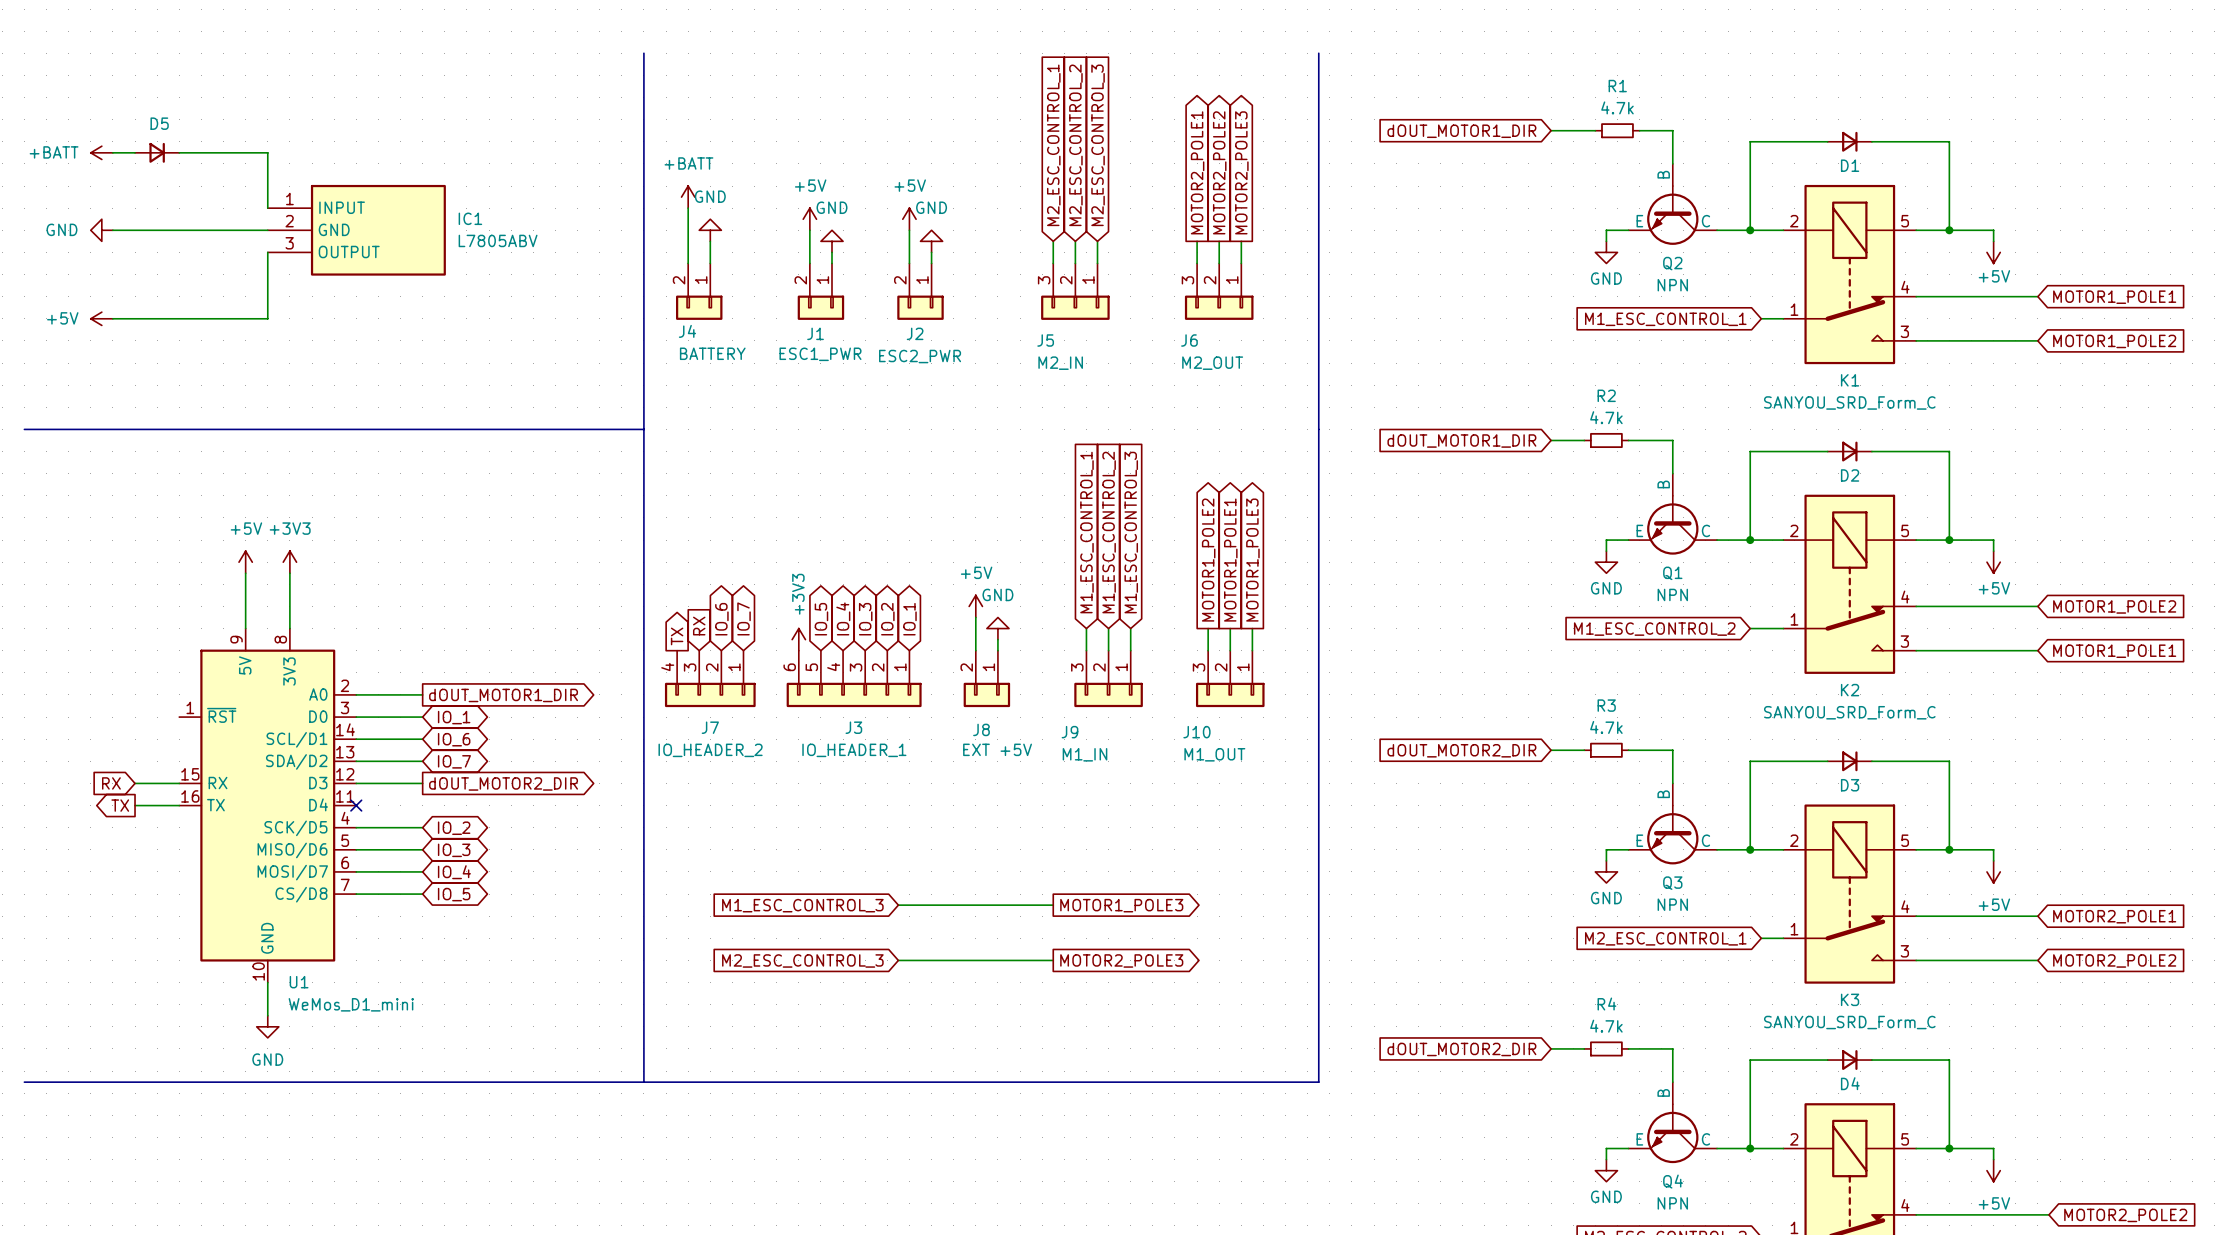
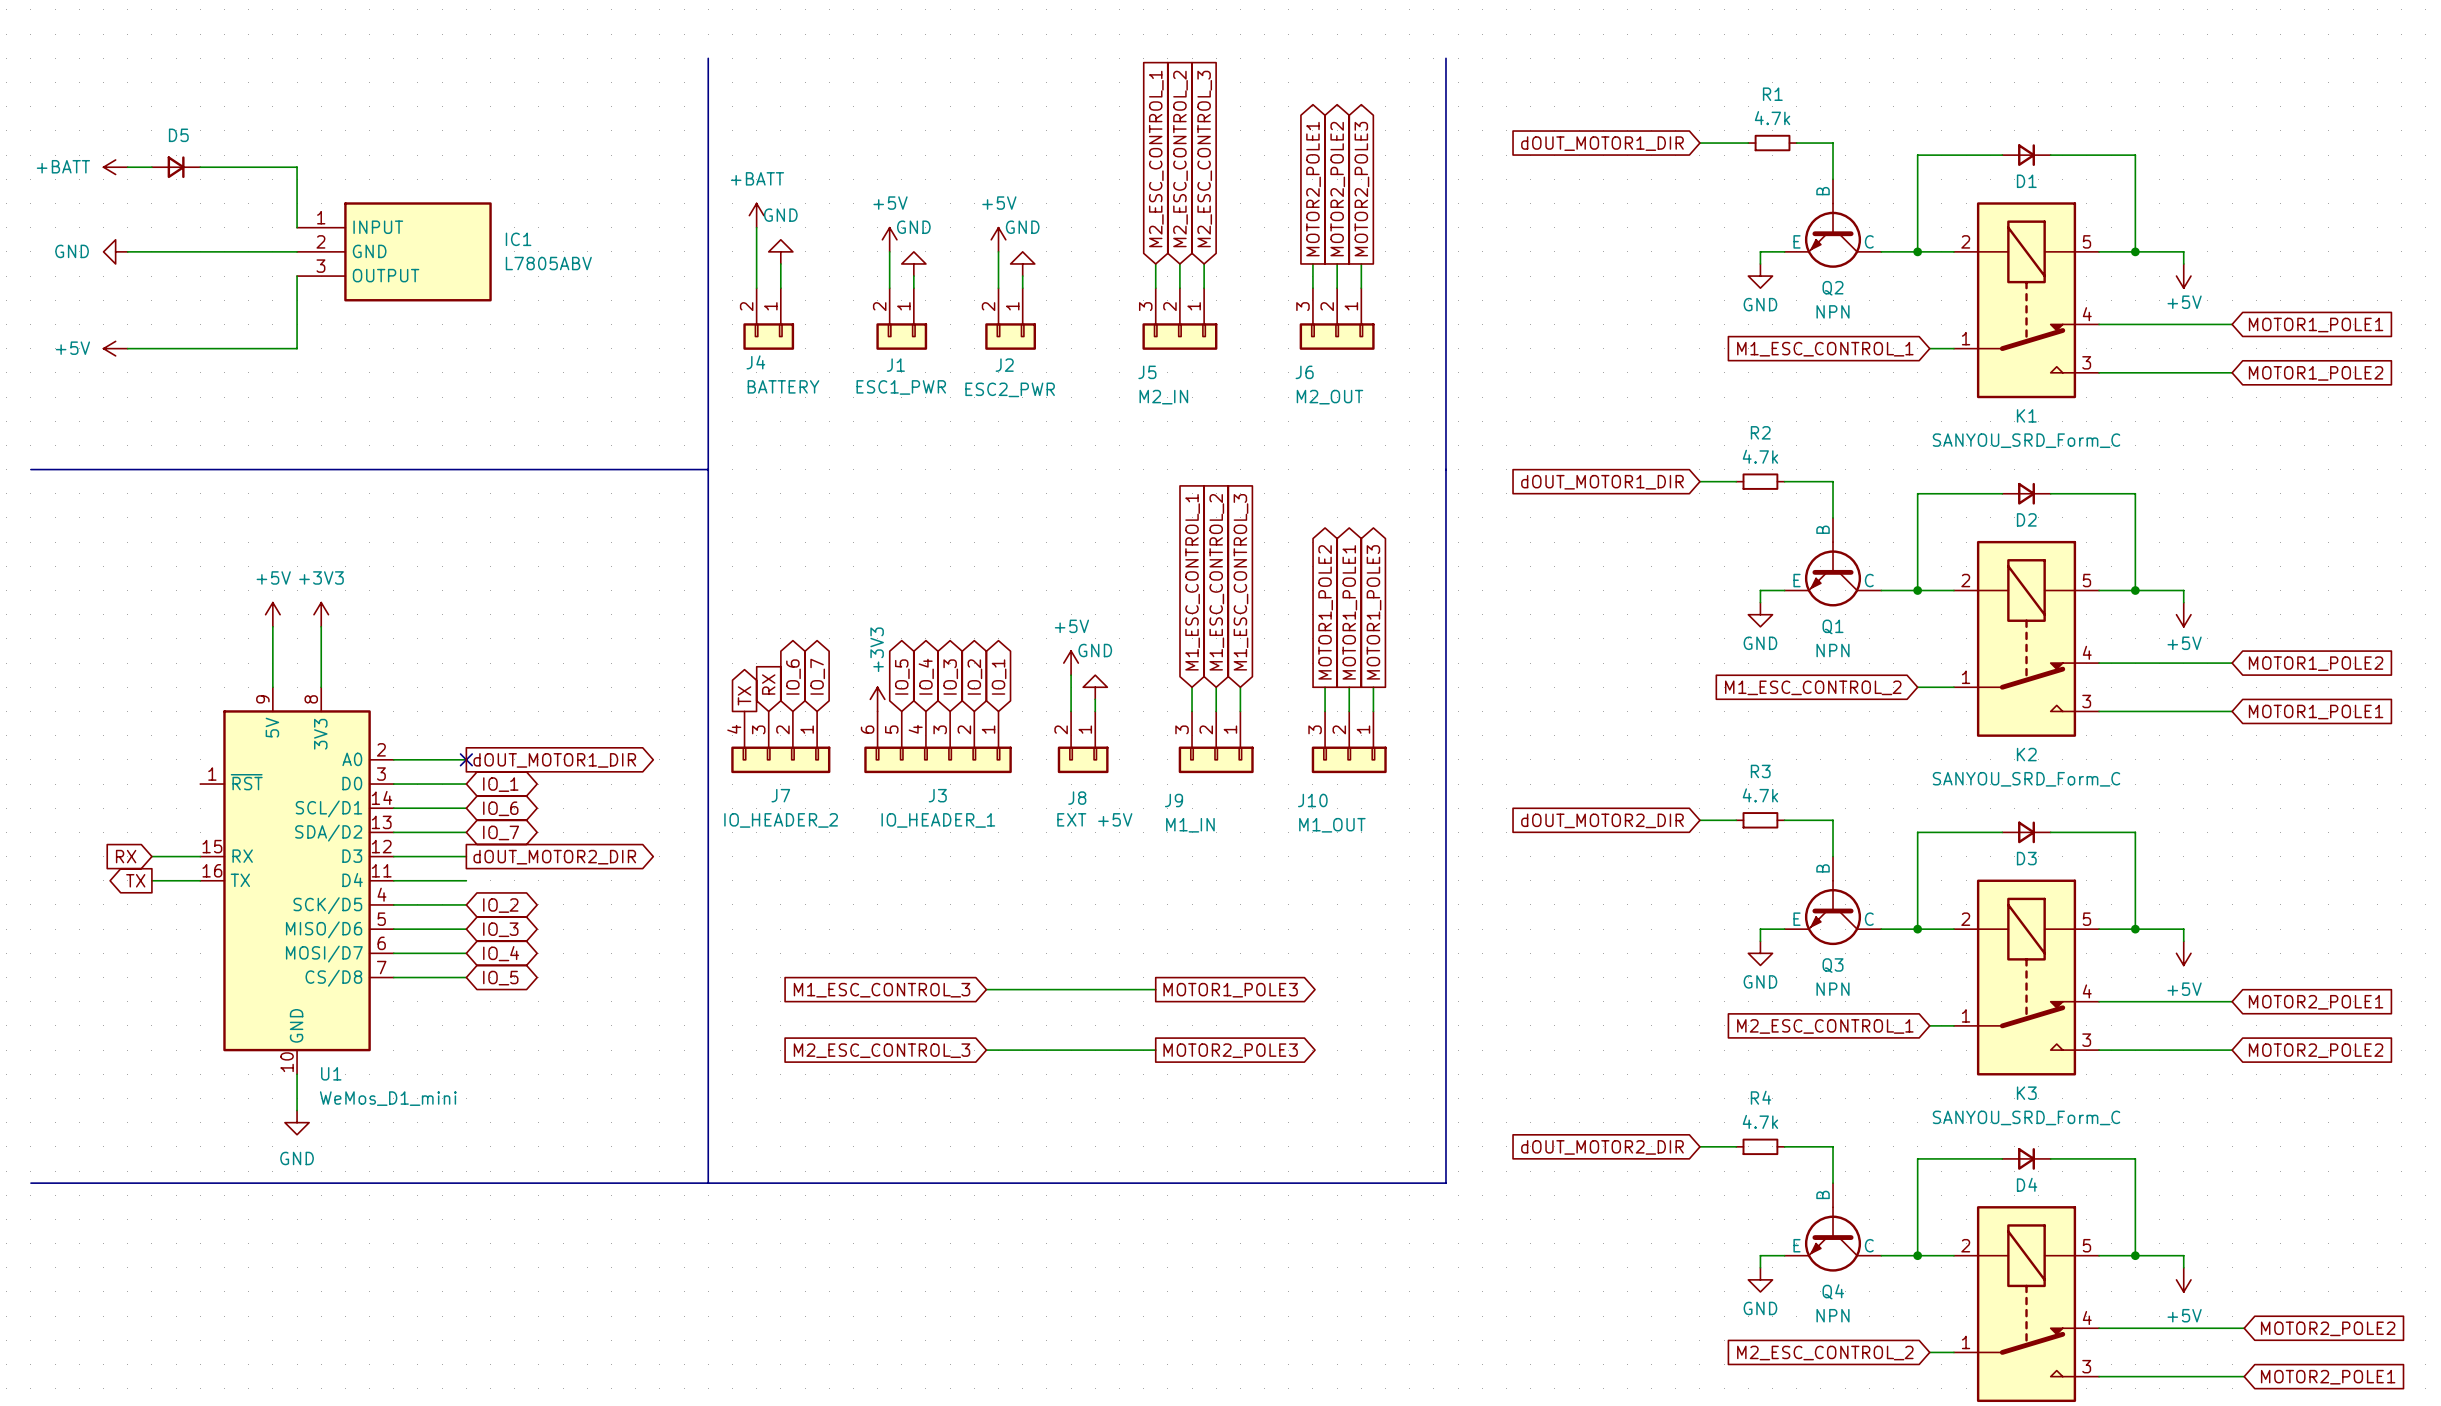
no-connect mark: none -> (466, 759)
wire: none -> (393, 880) (466, 880)
no-connect mark: (356, 805) -> none

